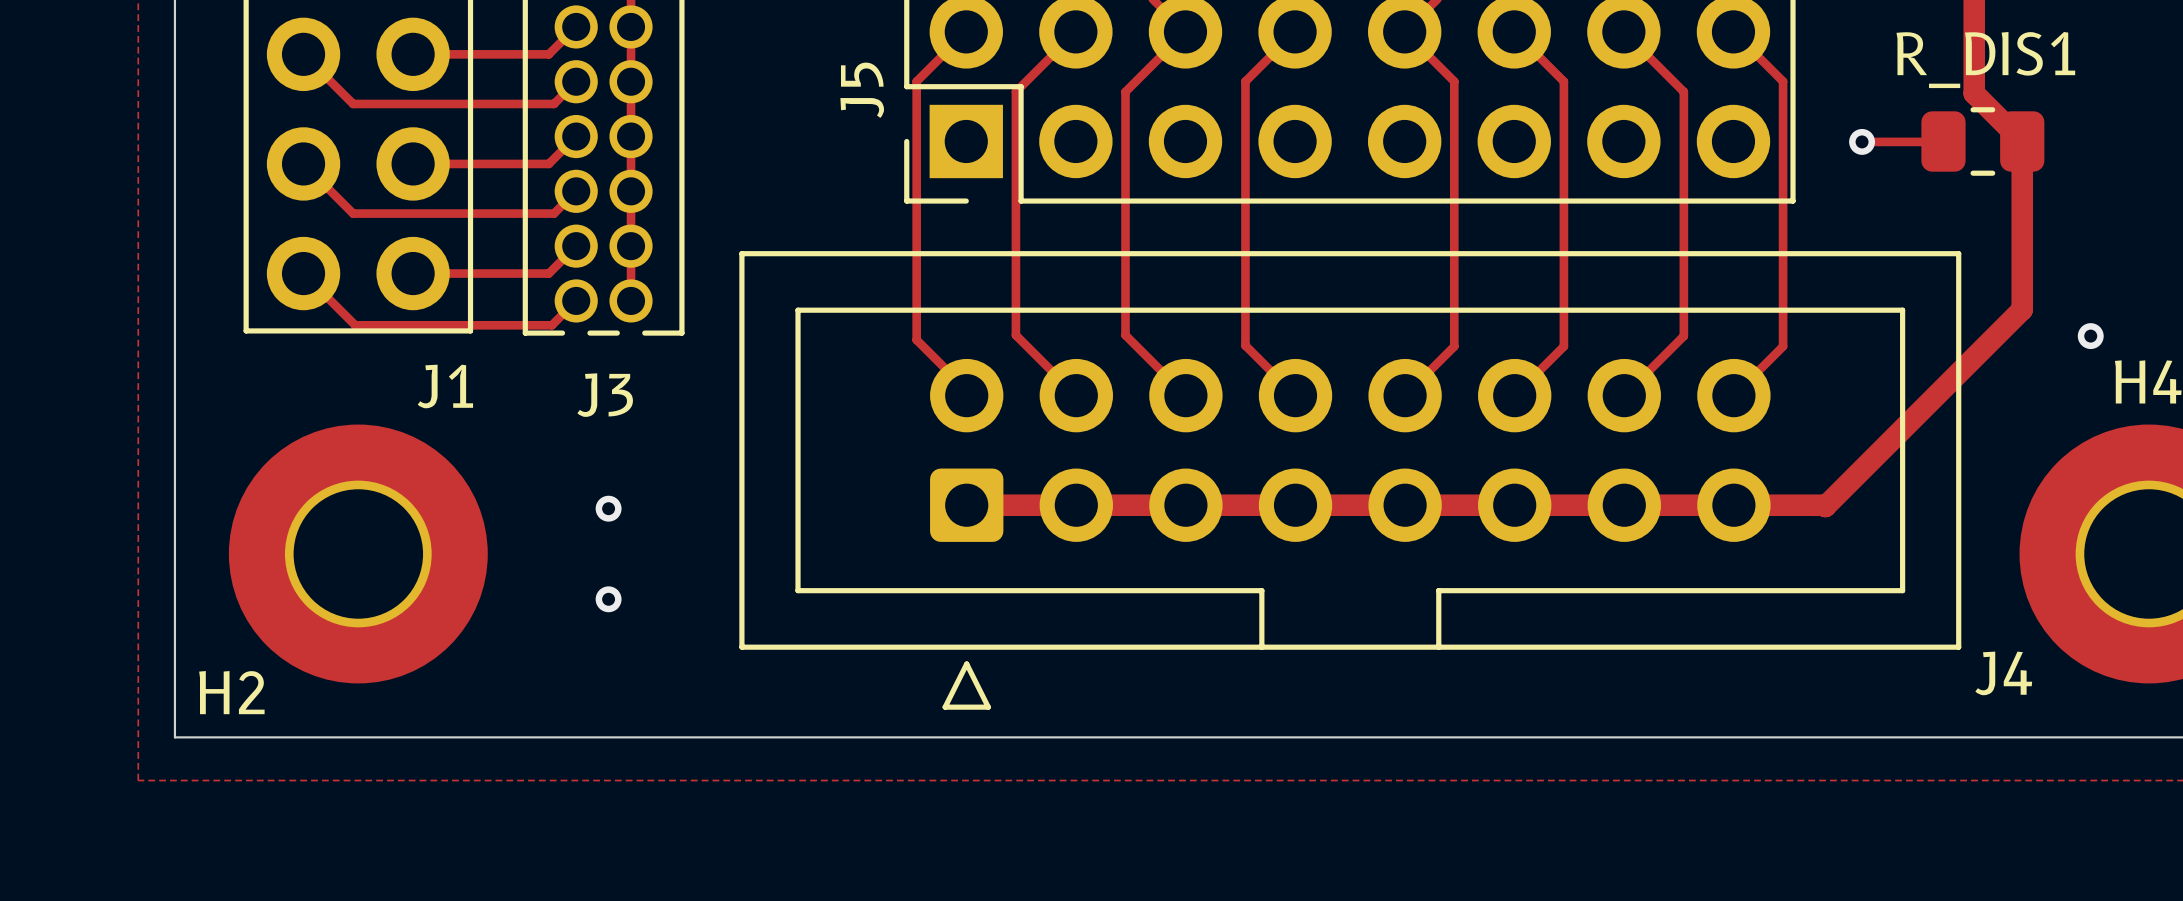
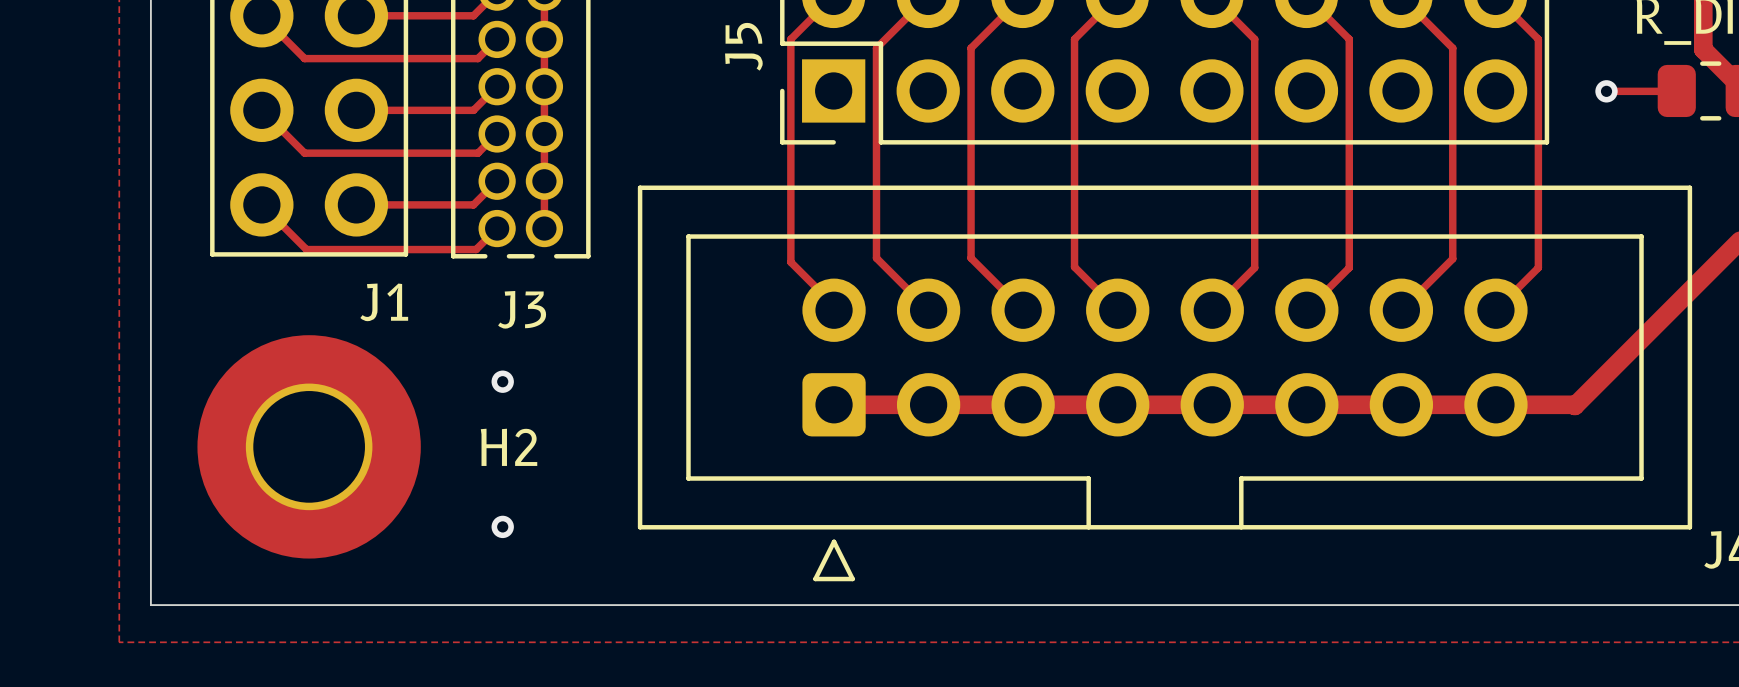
via position: (608, 508) -> (502, 381)
via position: (608, 599) -> (502, 526)
H2 name position: H2 (231, 692) -> H2 (509, 447)

